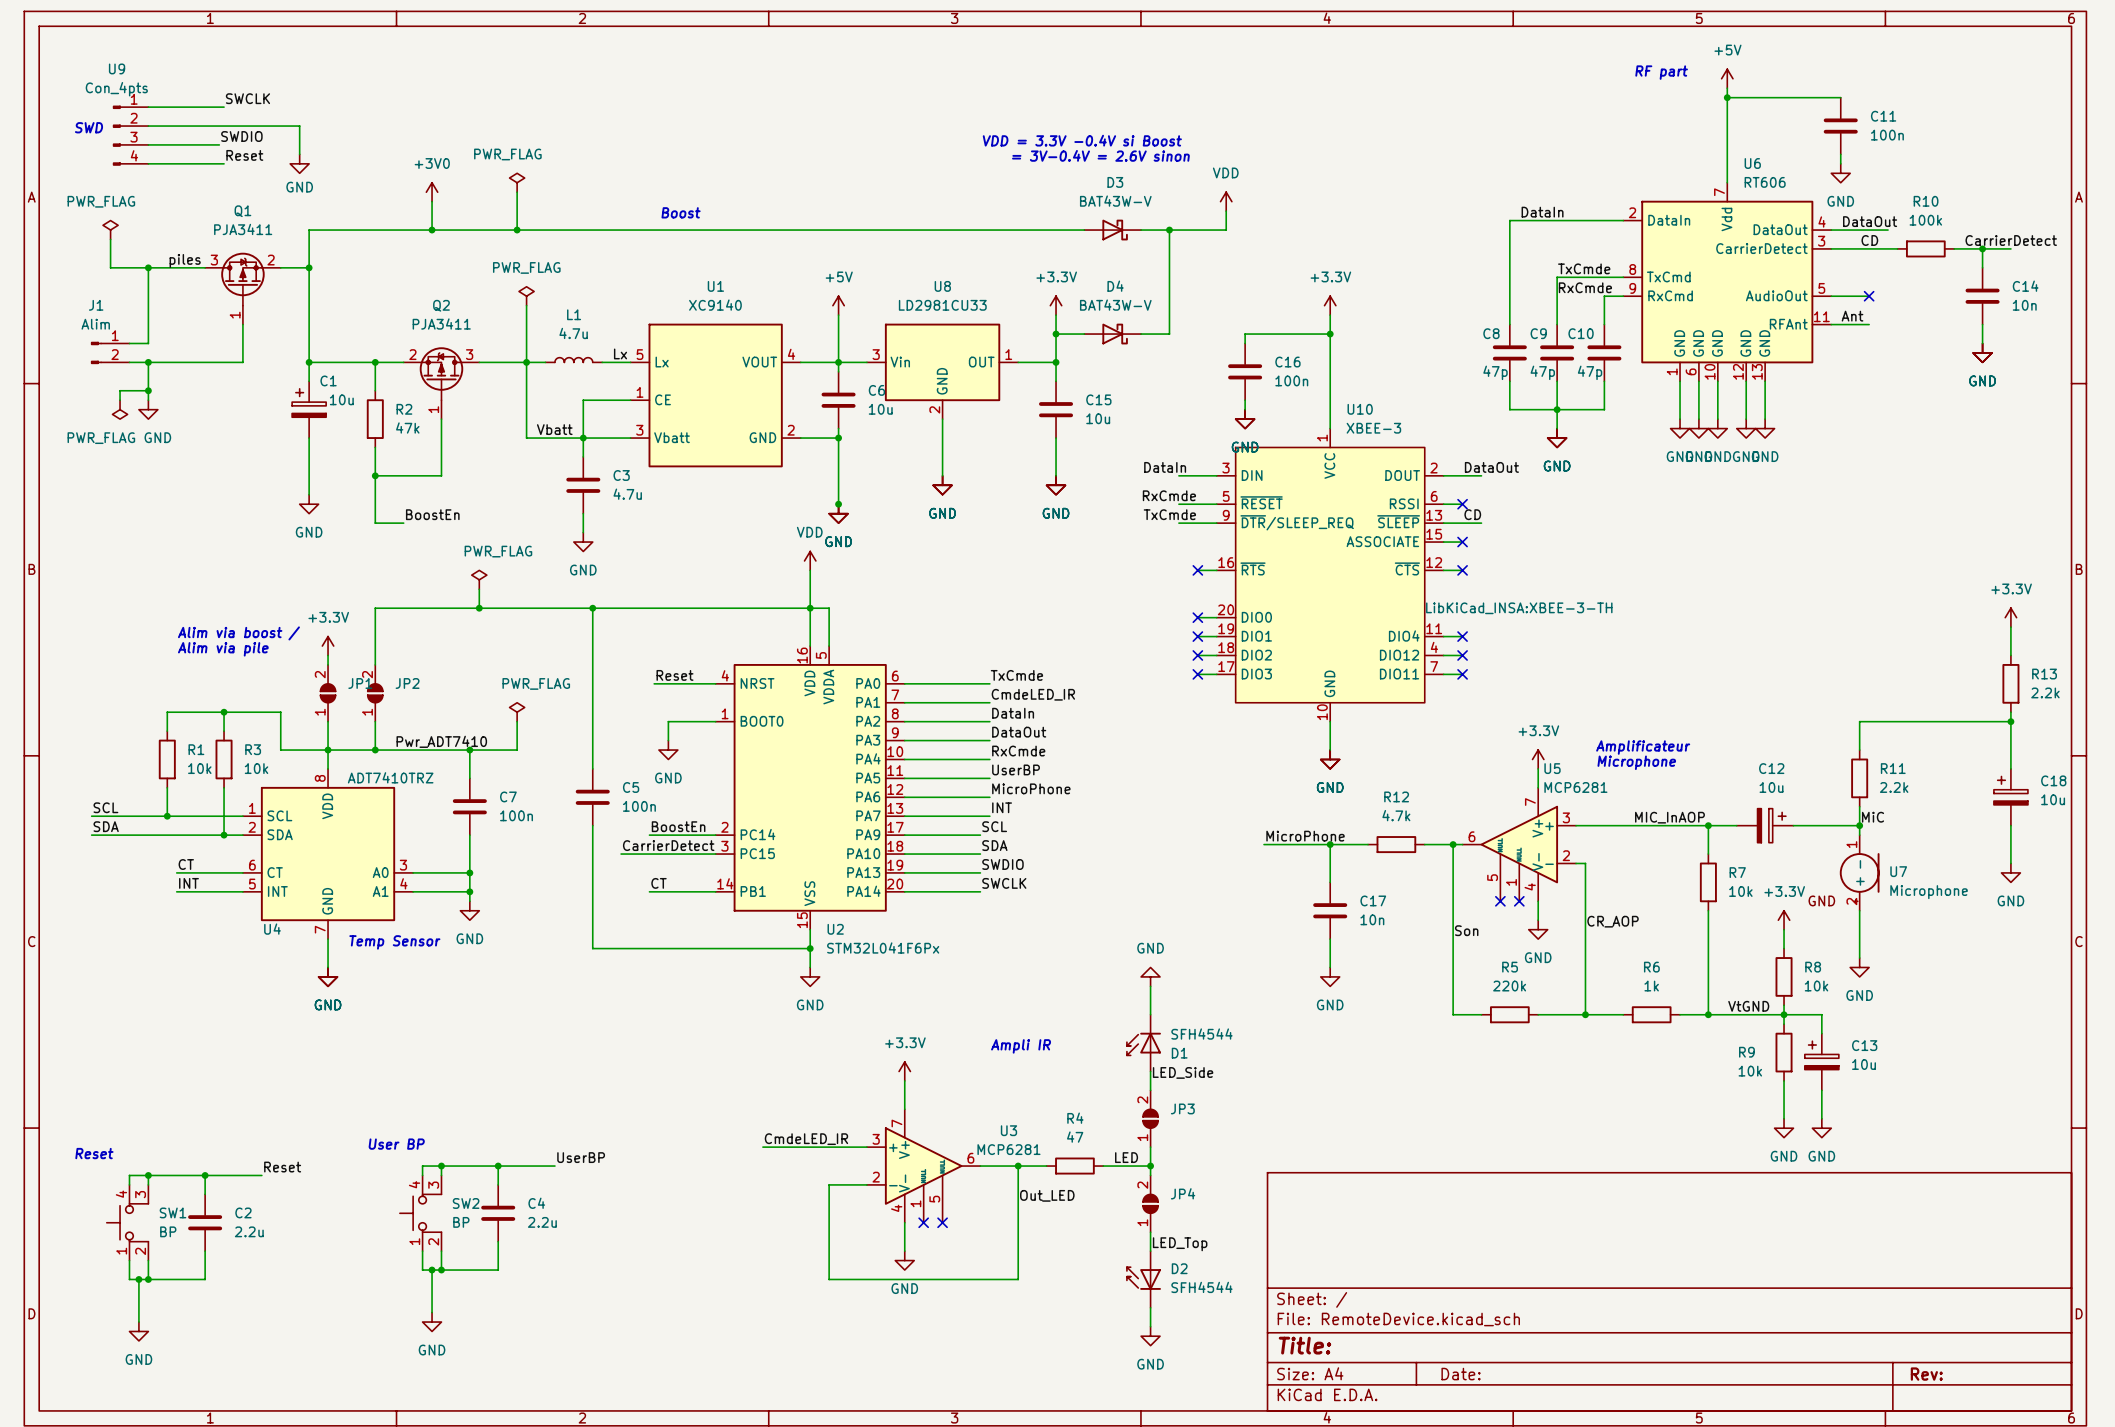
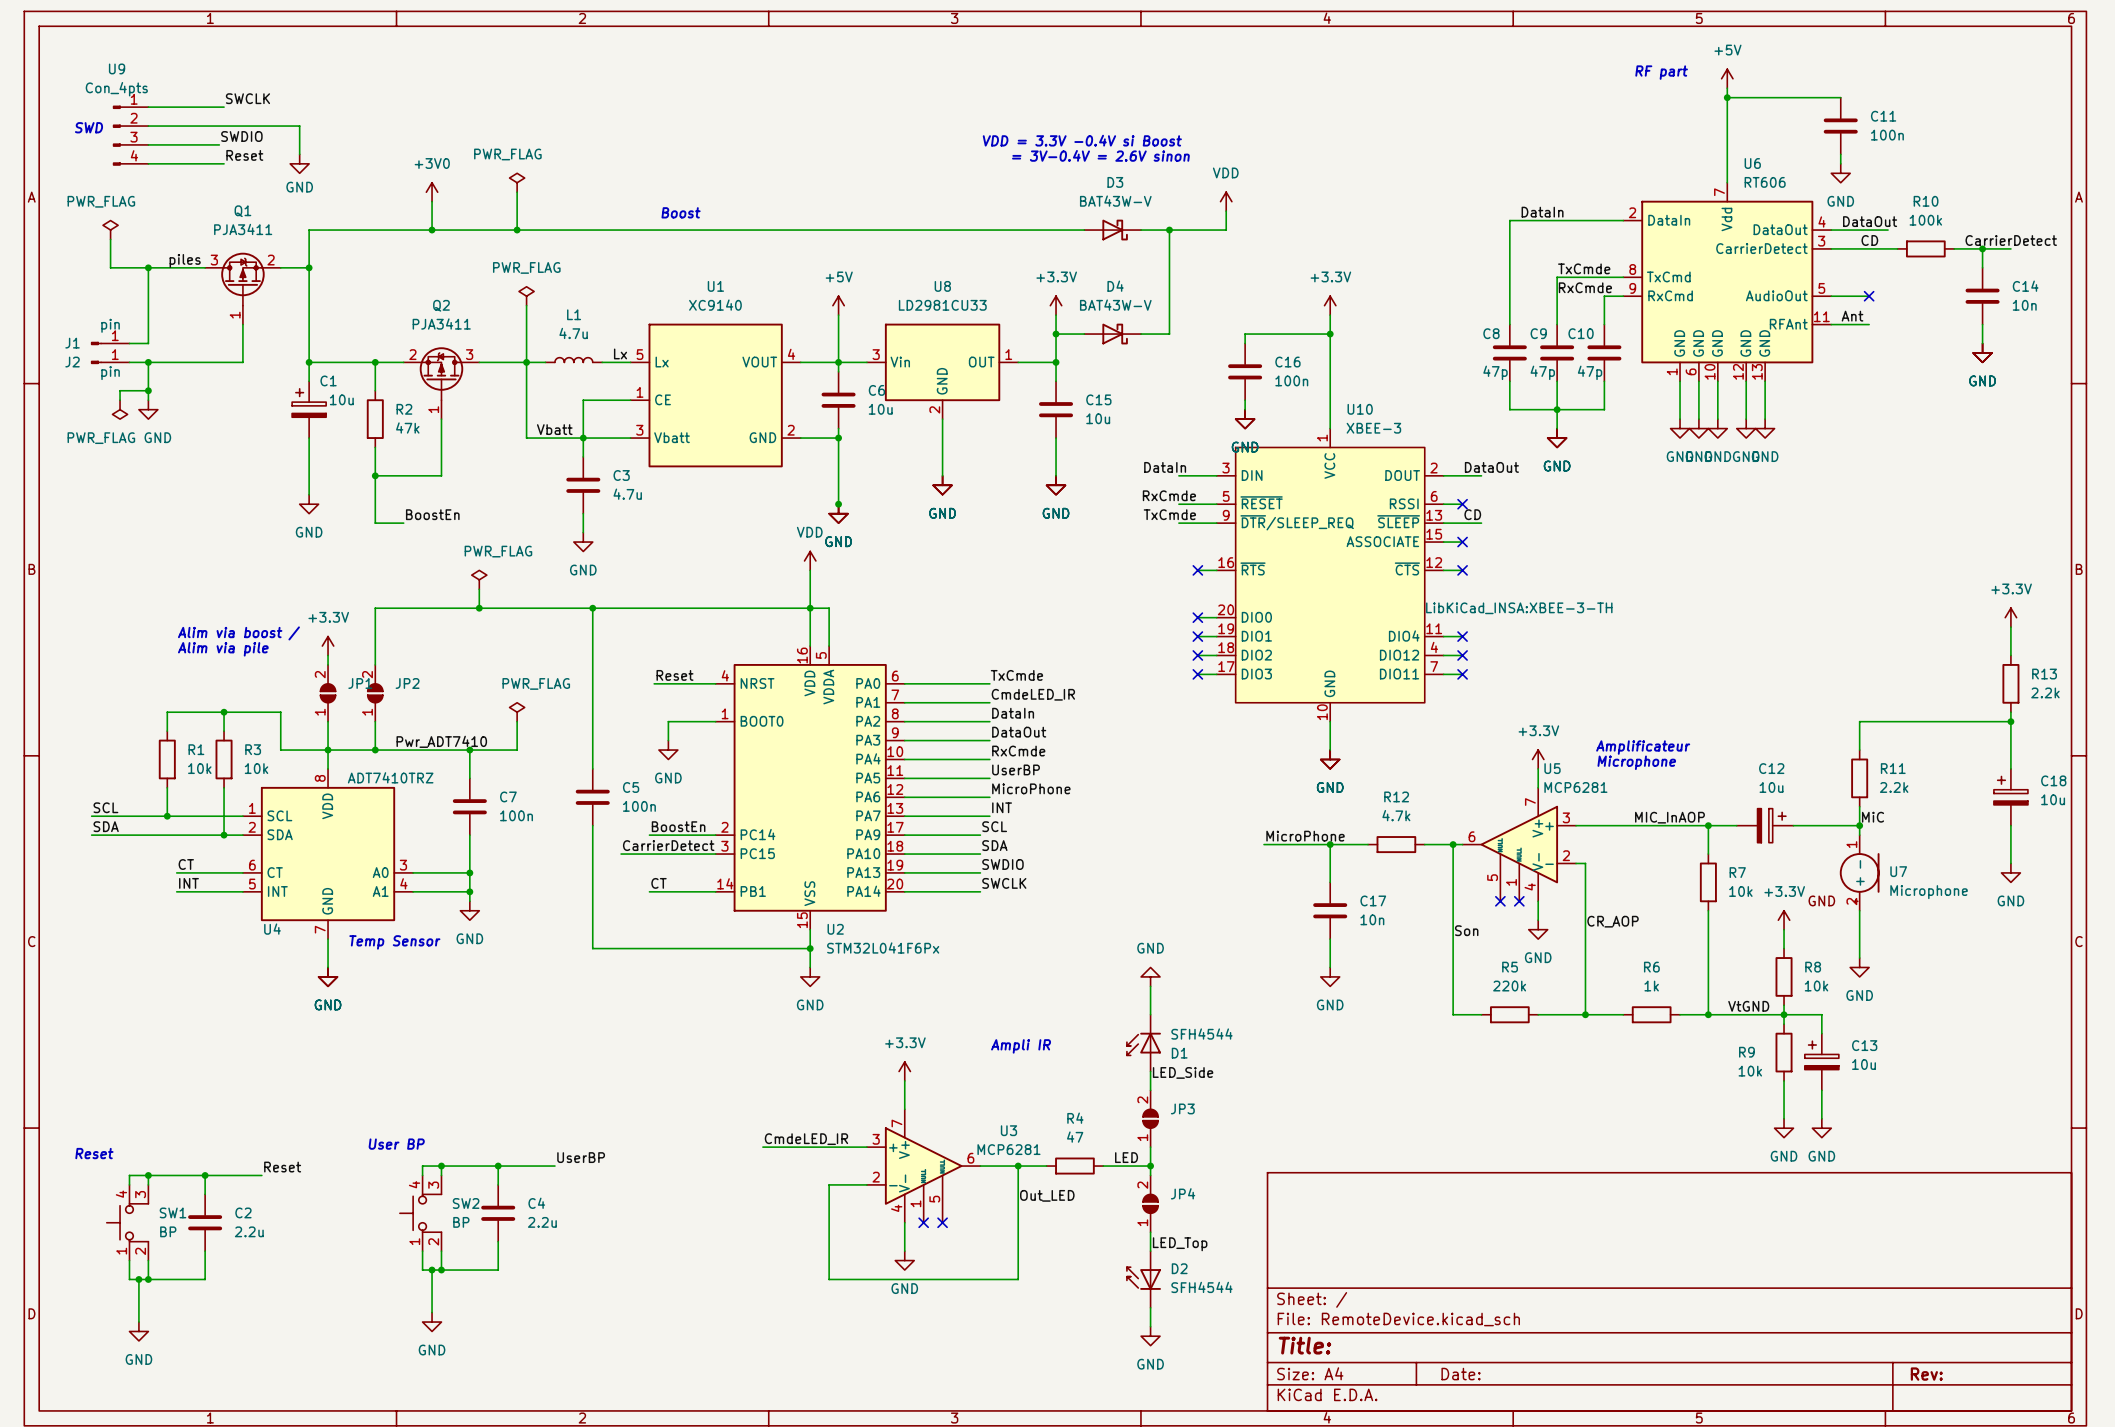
J1 name position: J1 (96, 305) -> J1 (72, 343)
J1 value: Alim (95, 324) -> pin (110, 325)
J1 symbol: [91, 341, 130, 364] -> [91, 341, 130, 346]
J2: none -> pin (110, 362)

